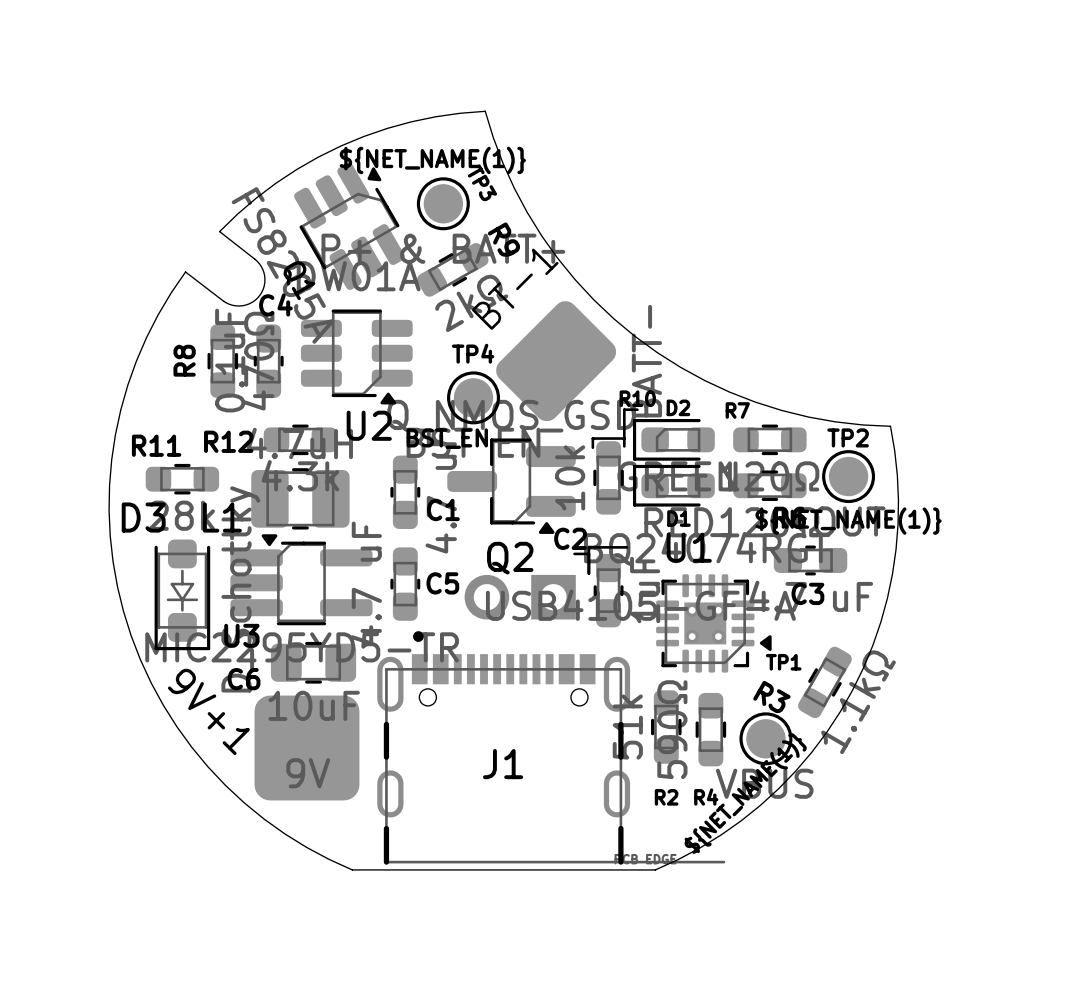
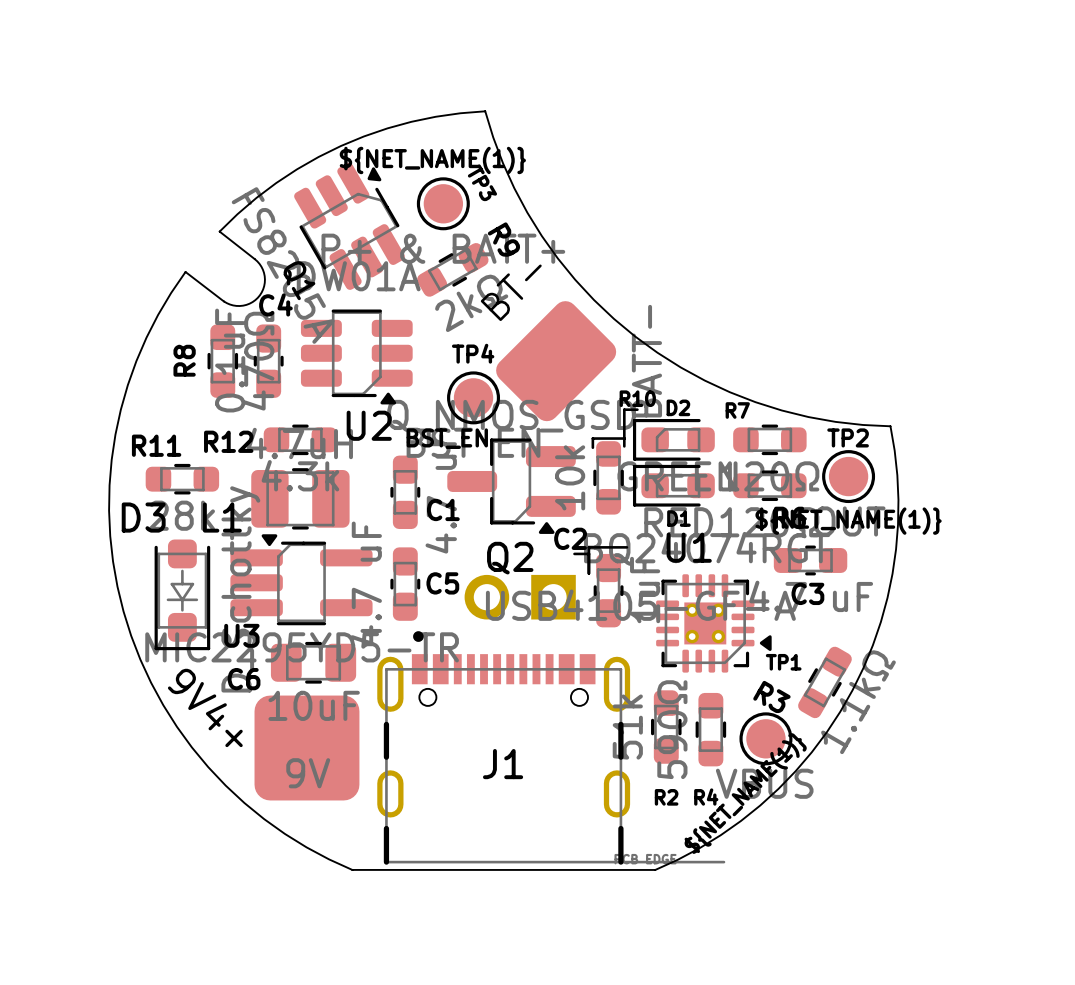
BT-1 name: BT-1 (515, 289) -> BT- (511, 292)
9V+1 name: 9V+1 (208, 711) -> 9V4+ (205, 707)

